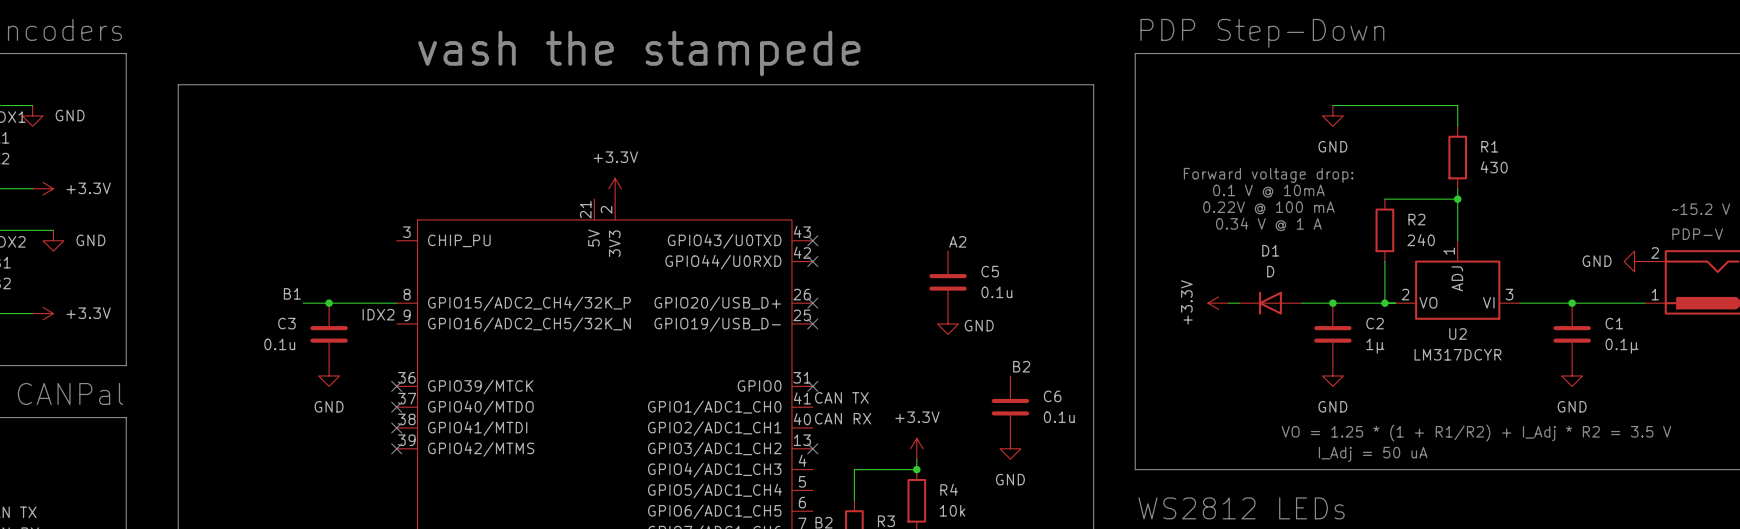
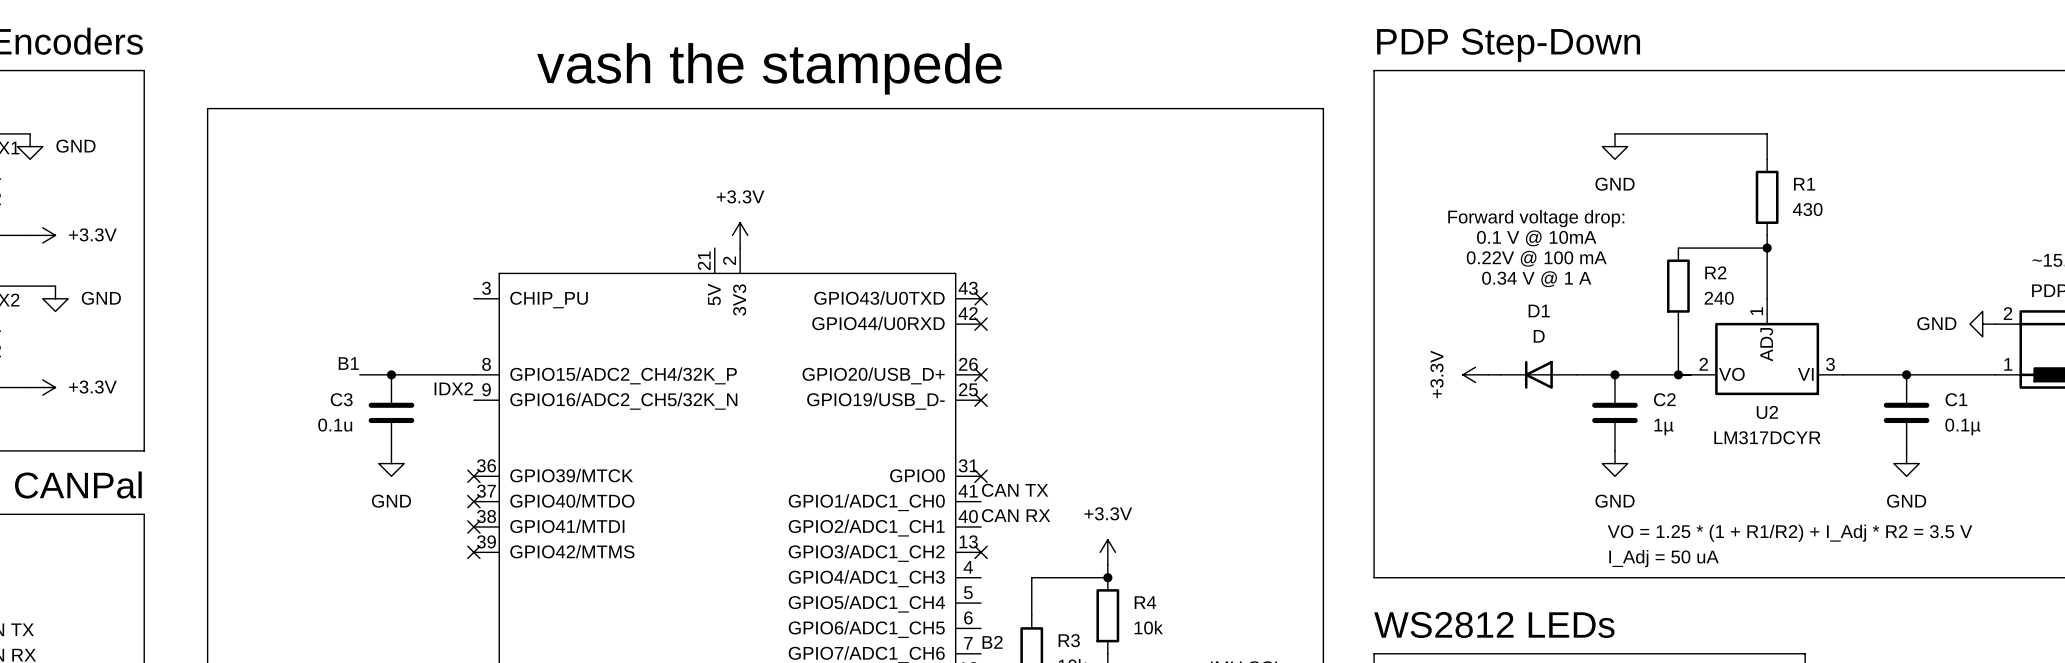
label: A2 (957, 241) -> none
C5: 0.1u (948, 282) -> none
power symbol: GND (948, 323) -> none
label: B2 (1021, 366) -> none
C6: 0.1u (1010, 407) -> none
power symbol: GND (1010, 448) -> none

